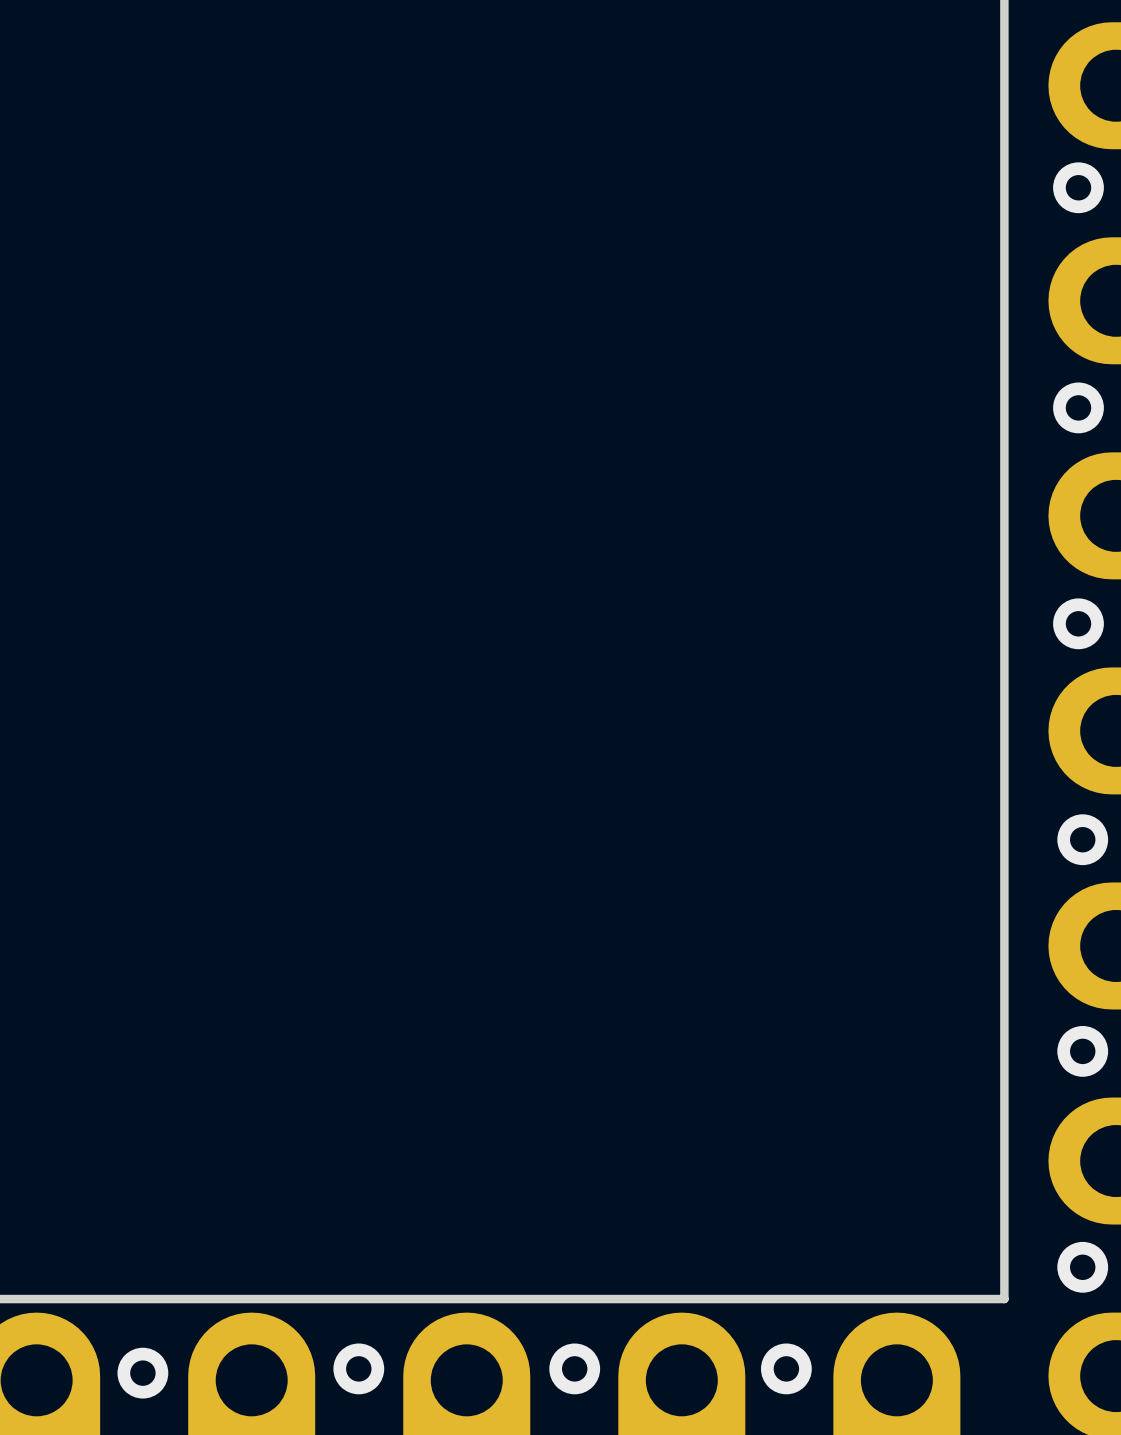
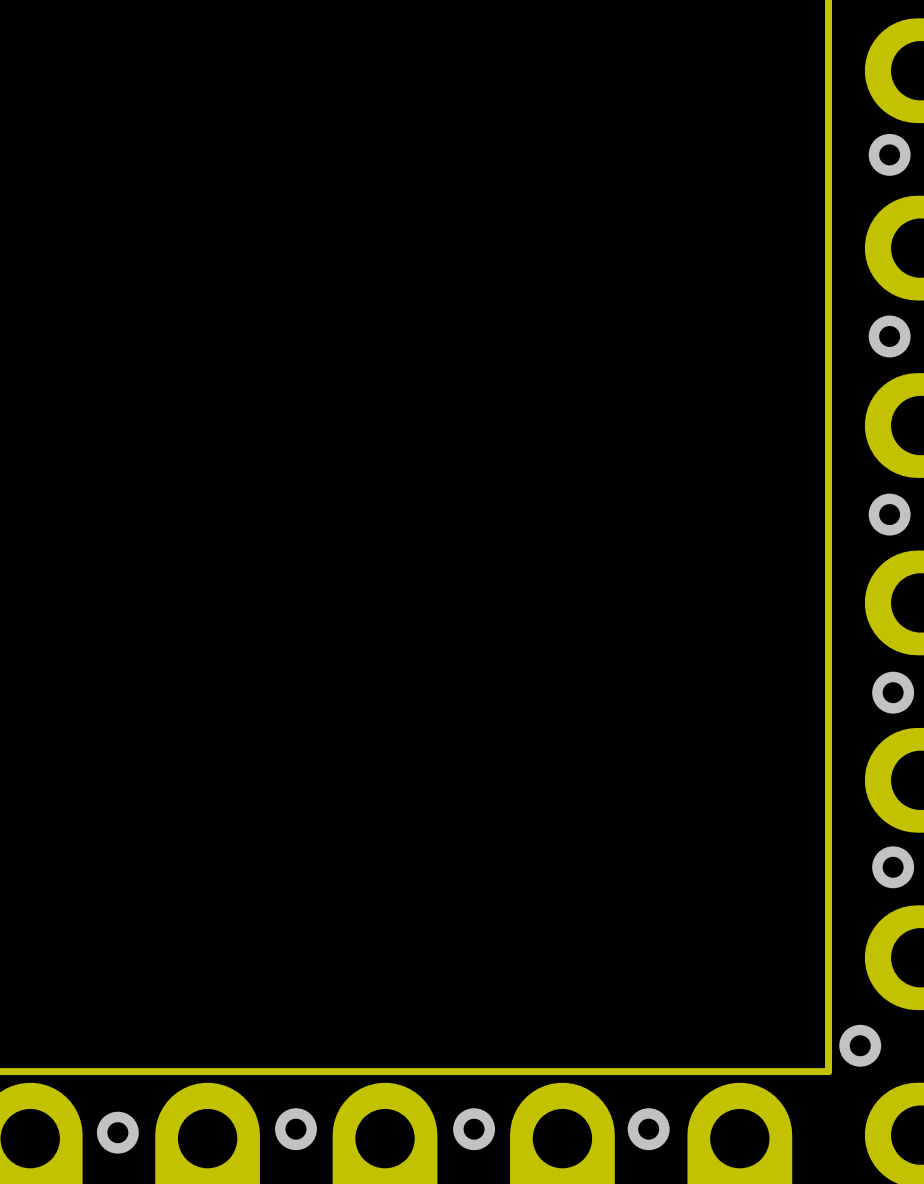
via position: (1082, 1267) -> (860, 1045)

